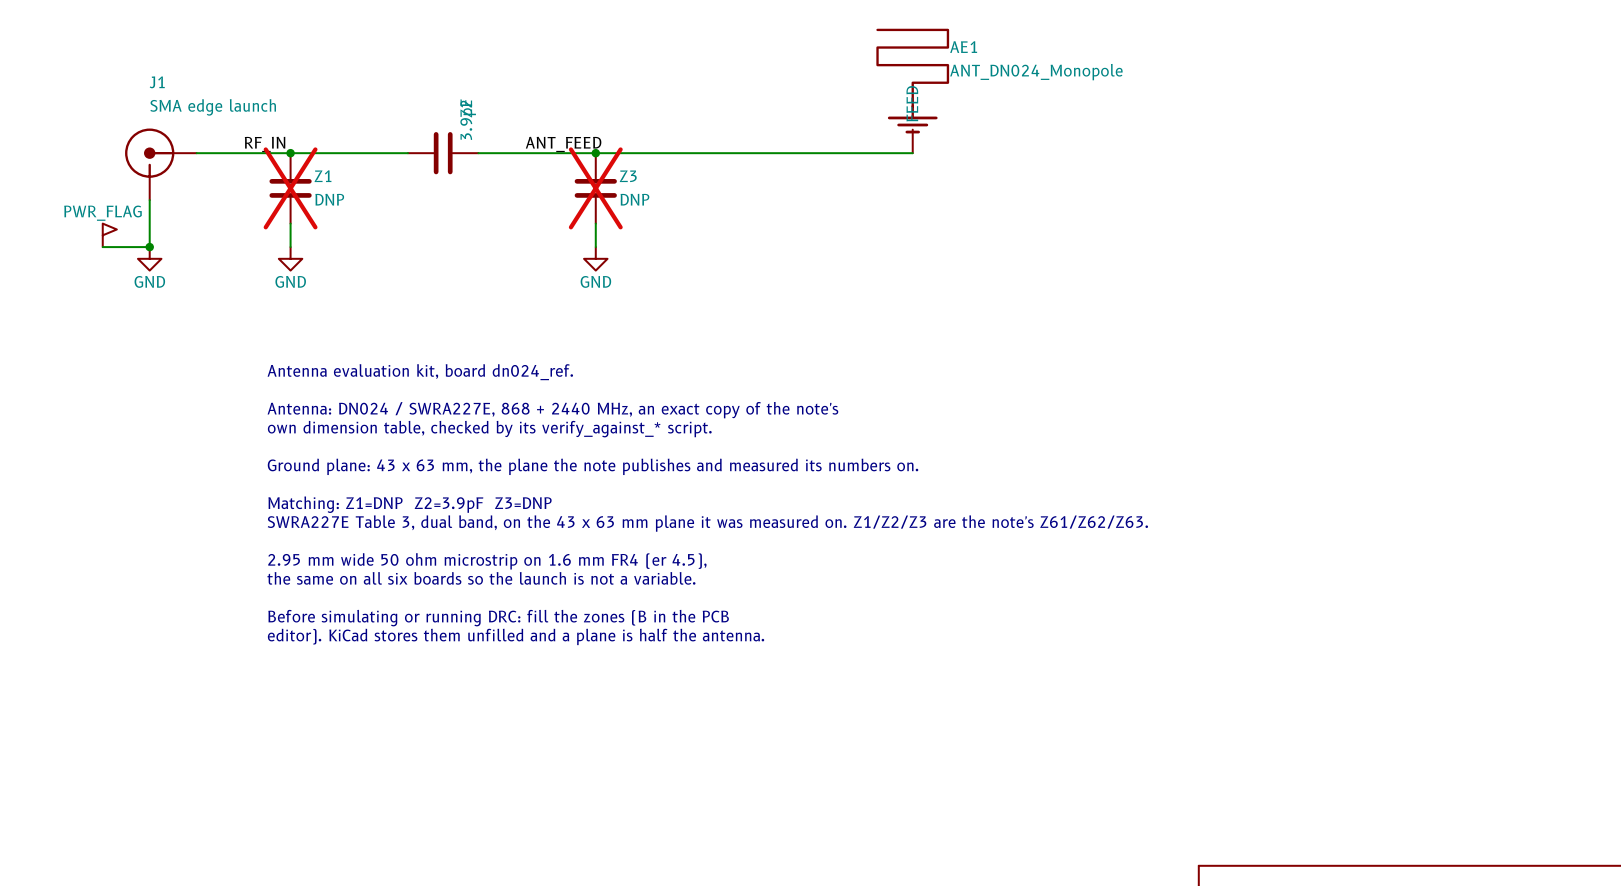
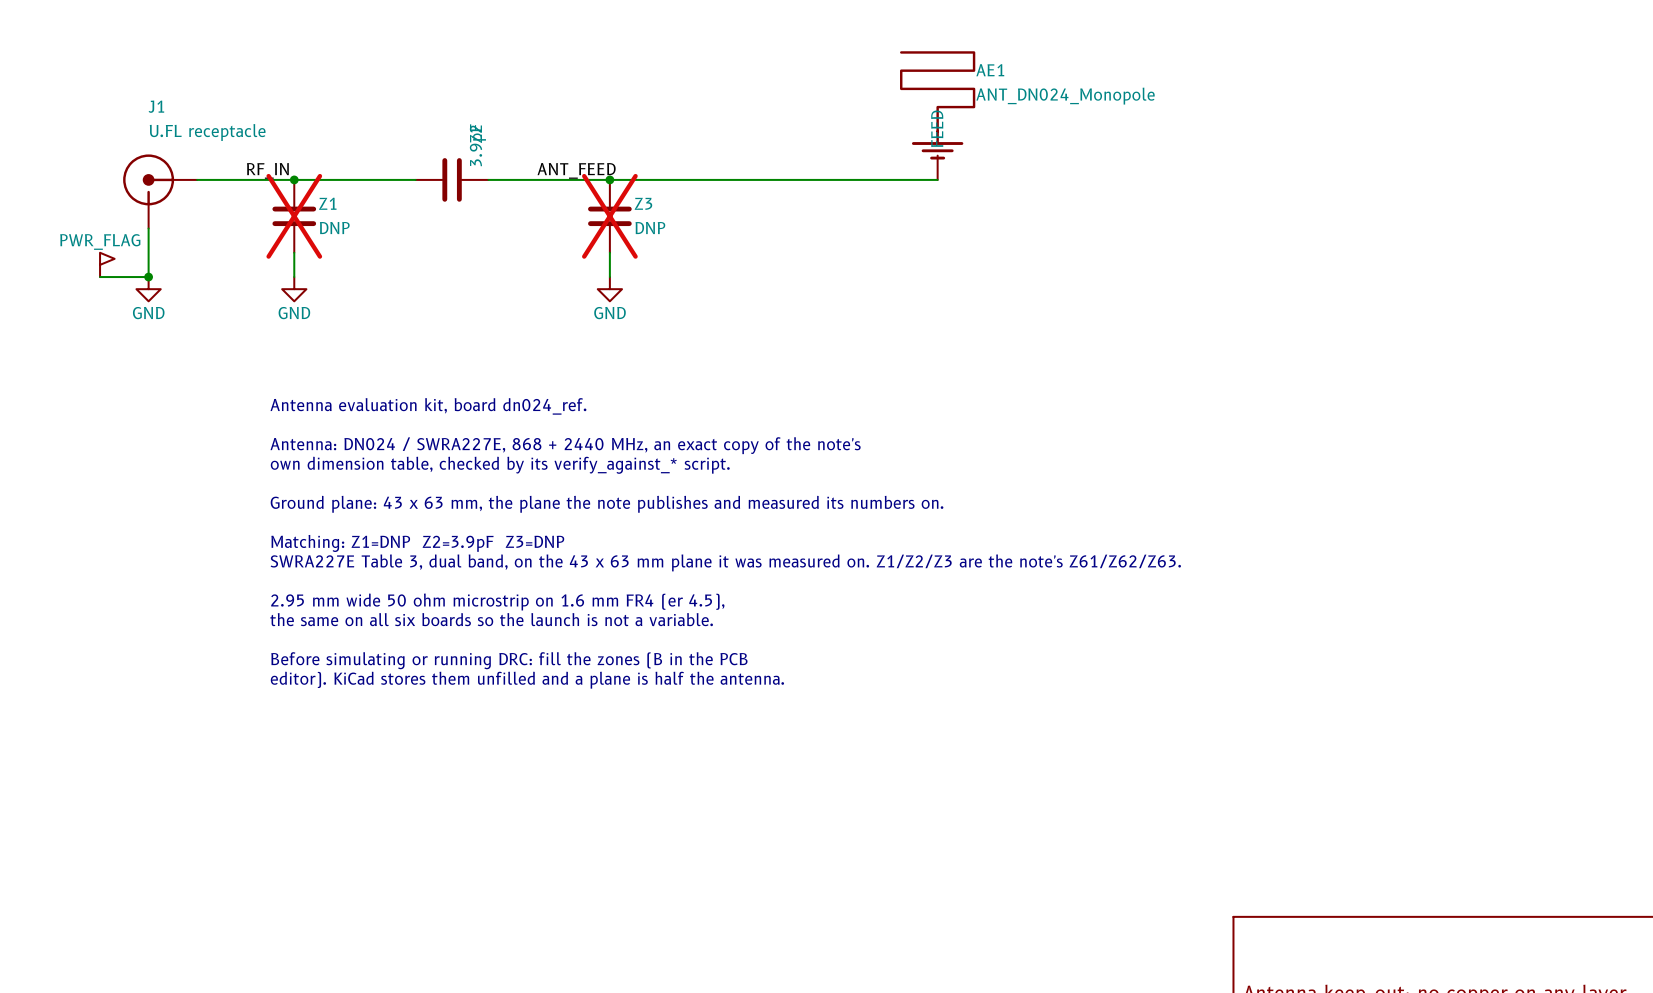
J1 value: SMA edge launch (213, 107) -> U.FL receptacle (207, 132)

